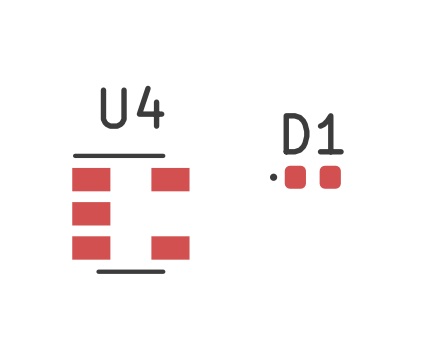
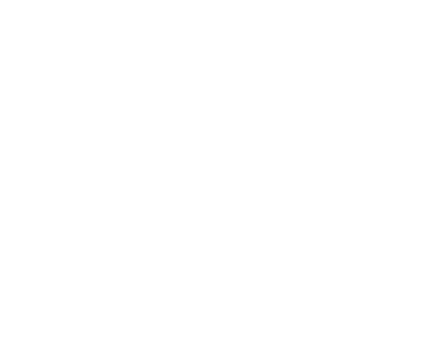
D1: (305, 177) -> none
U4: (130, 213) -> none

